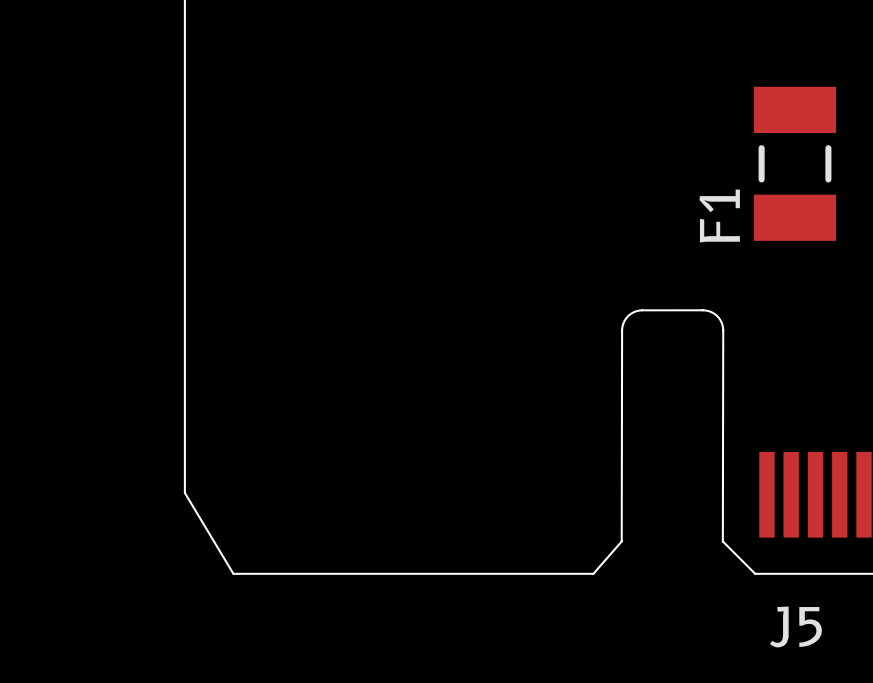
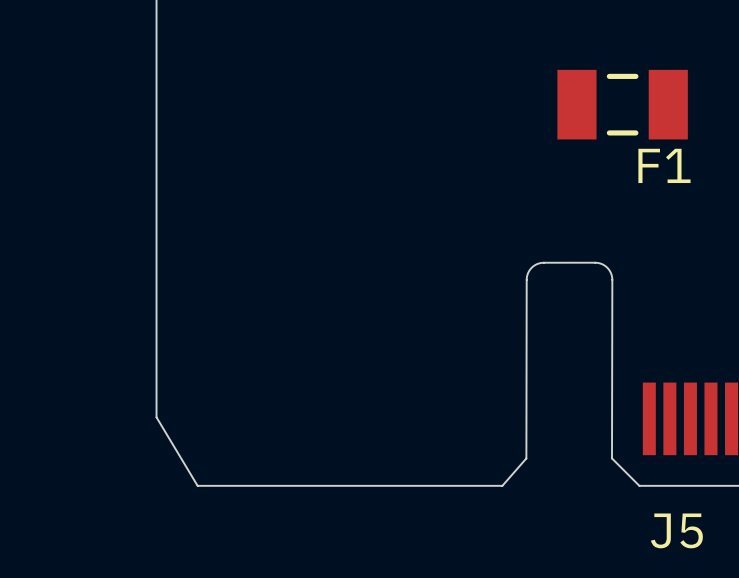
F1 rotation: 0° (795, 163) -> 90° clockwise (622, 104)
F1 name position: F1 (719, 216) -> F1 (664, 165)

